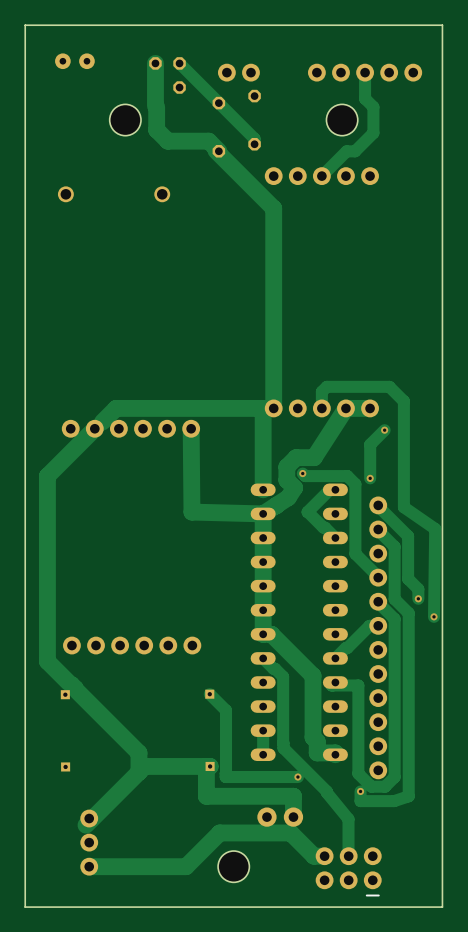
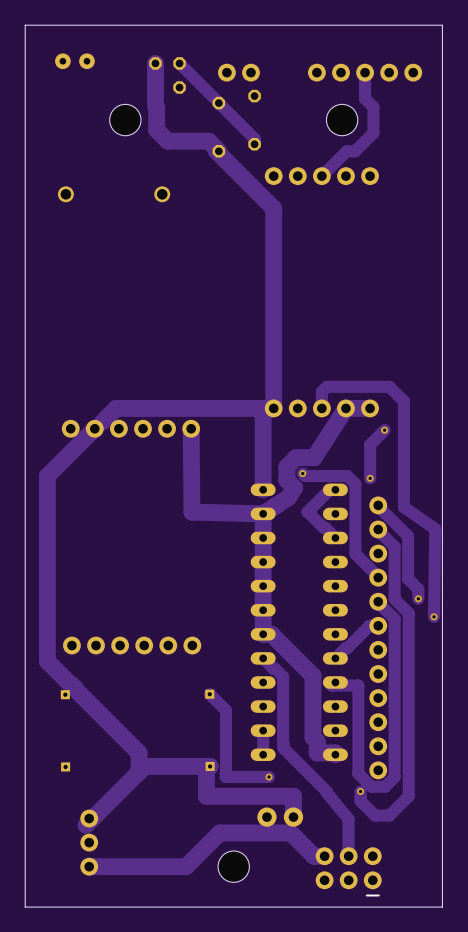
track: (297, 777) (269, 777) -> none
via position: (297, 777) -> (269, 777)
track: (408, 796) (394, 801) (360, 801) -> (408, 796) (389, 815) (375, 815) (360, 801)

